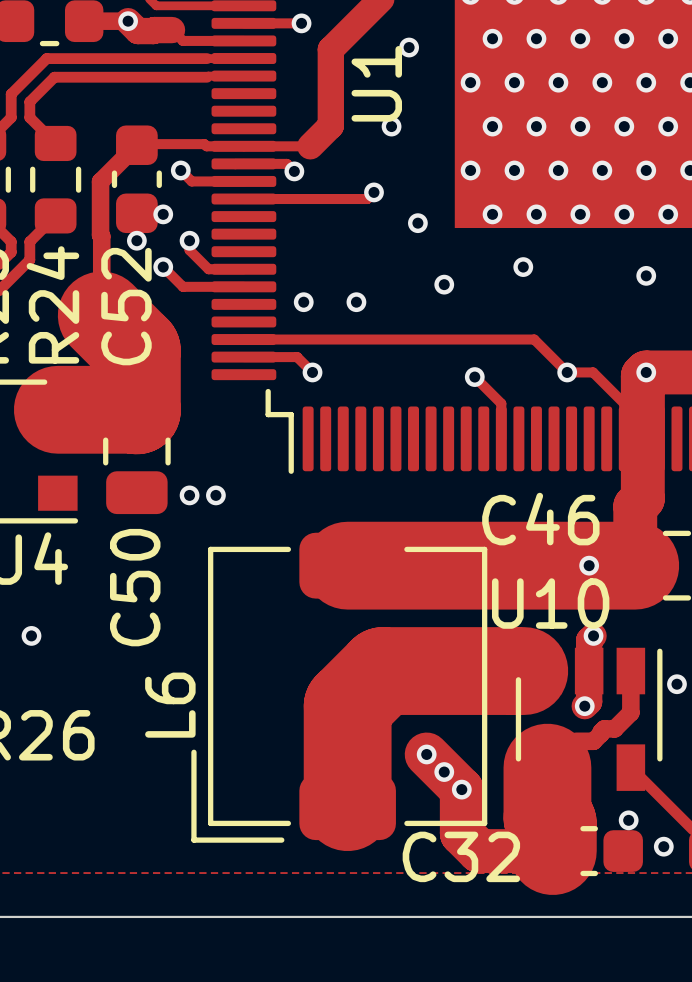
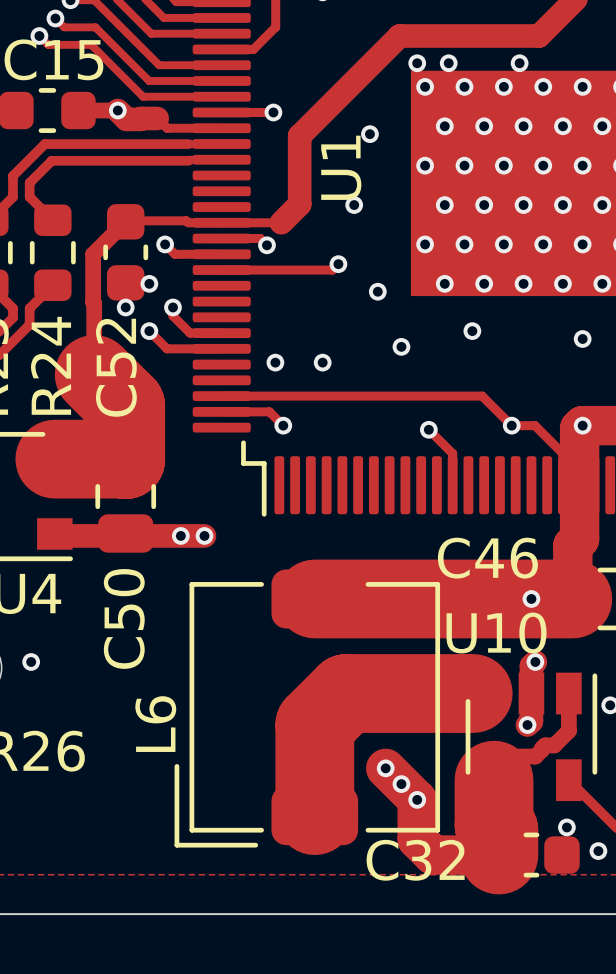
track: none -> (54, 533) (56, 535) (204, 535)
via: (189, 495) -> none
via: none -> (180, 535)
via: (215, 495) -> none
via: none -> (204, 535)

